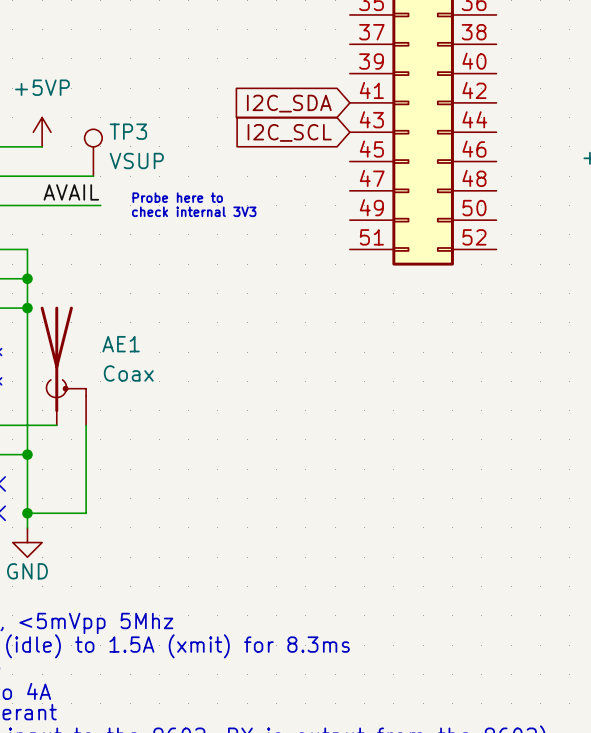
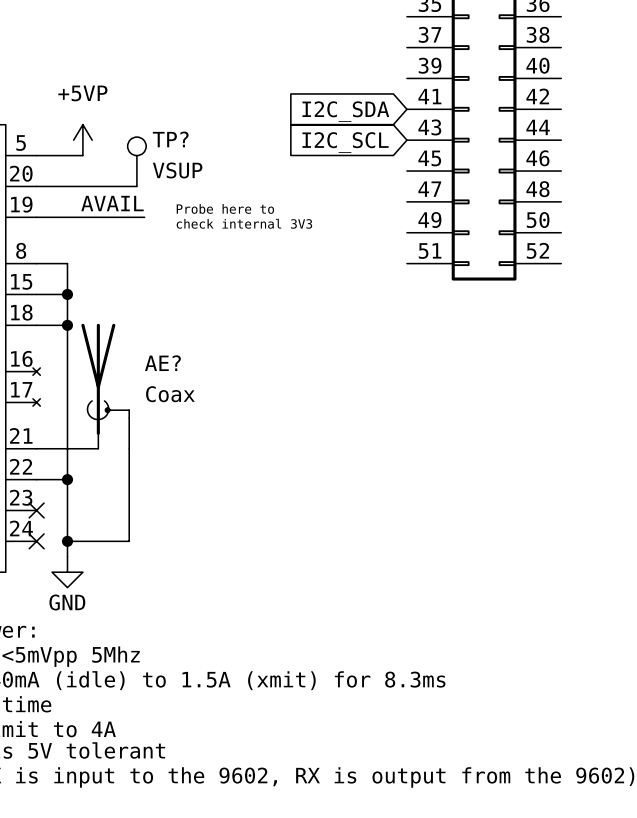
TP3 name: TP3 (128, 131) -> TP? (170, 139)
AE1 name: AE1 (121, 344) -> AE? (162, 363)

